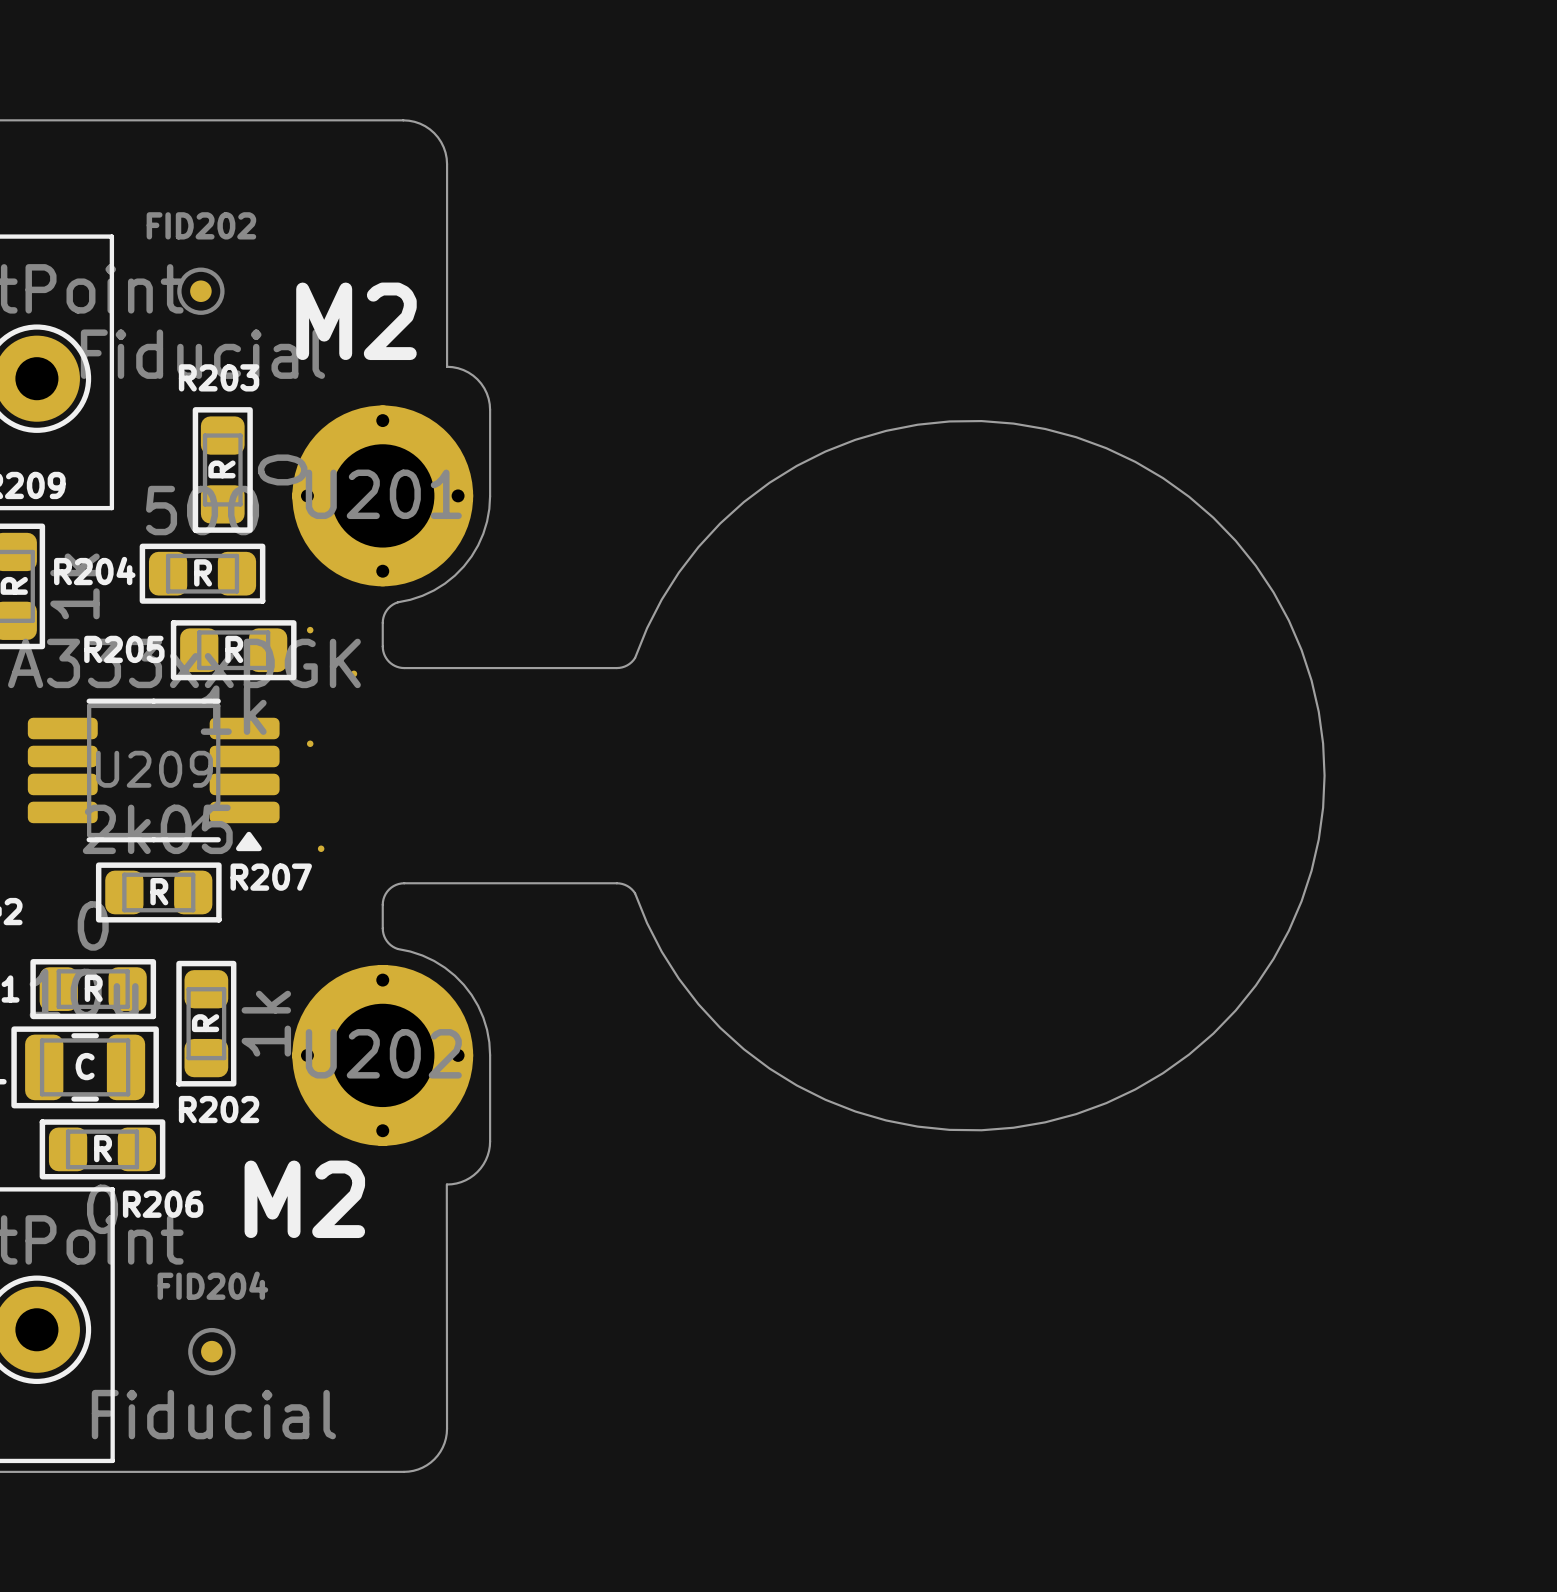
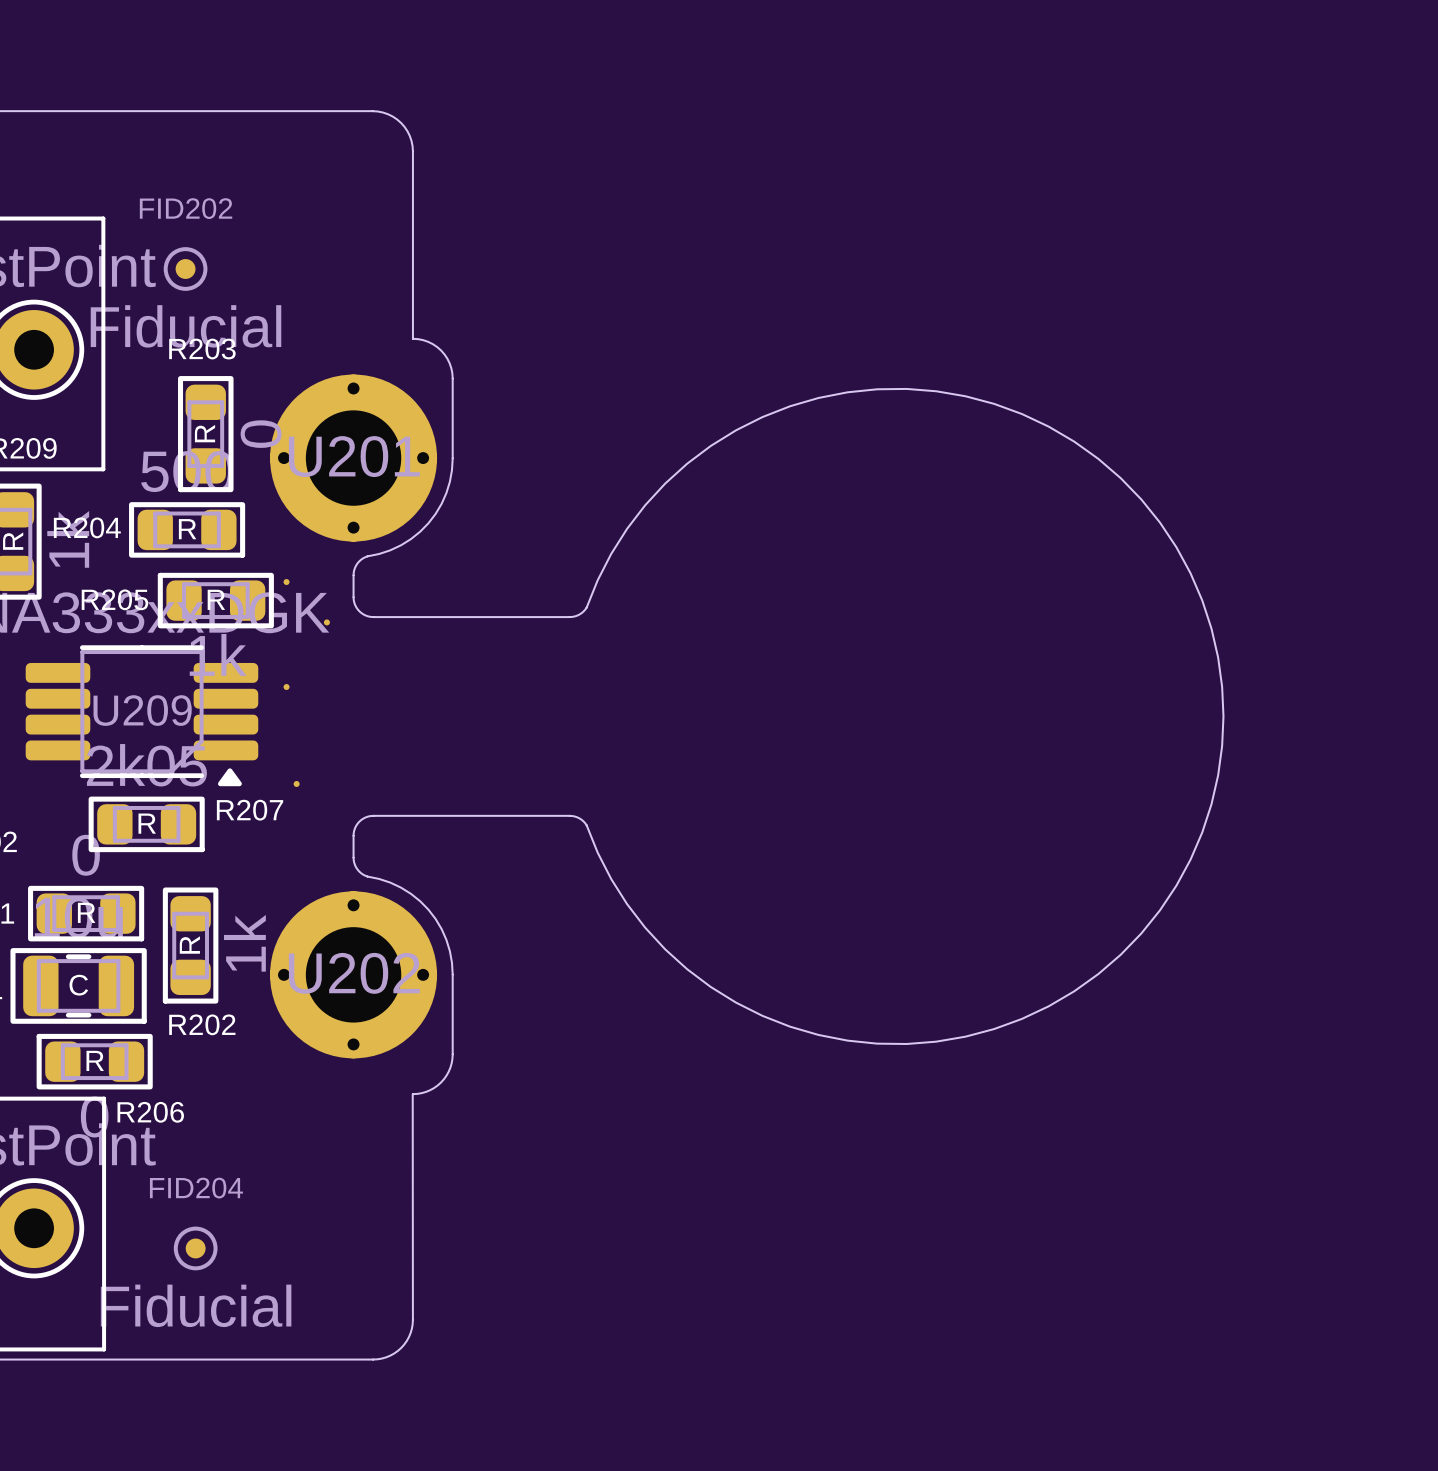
text: M2 (356, 321) -> none
text: M2 (304, 1199) -> none

